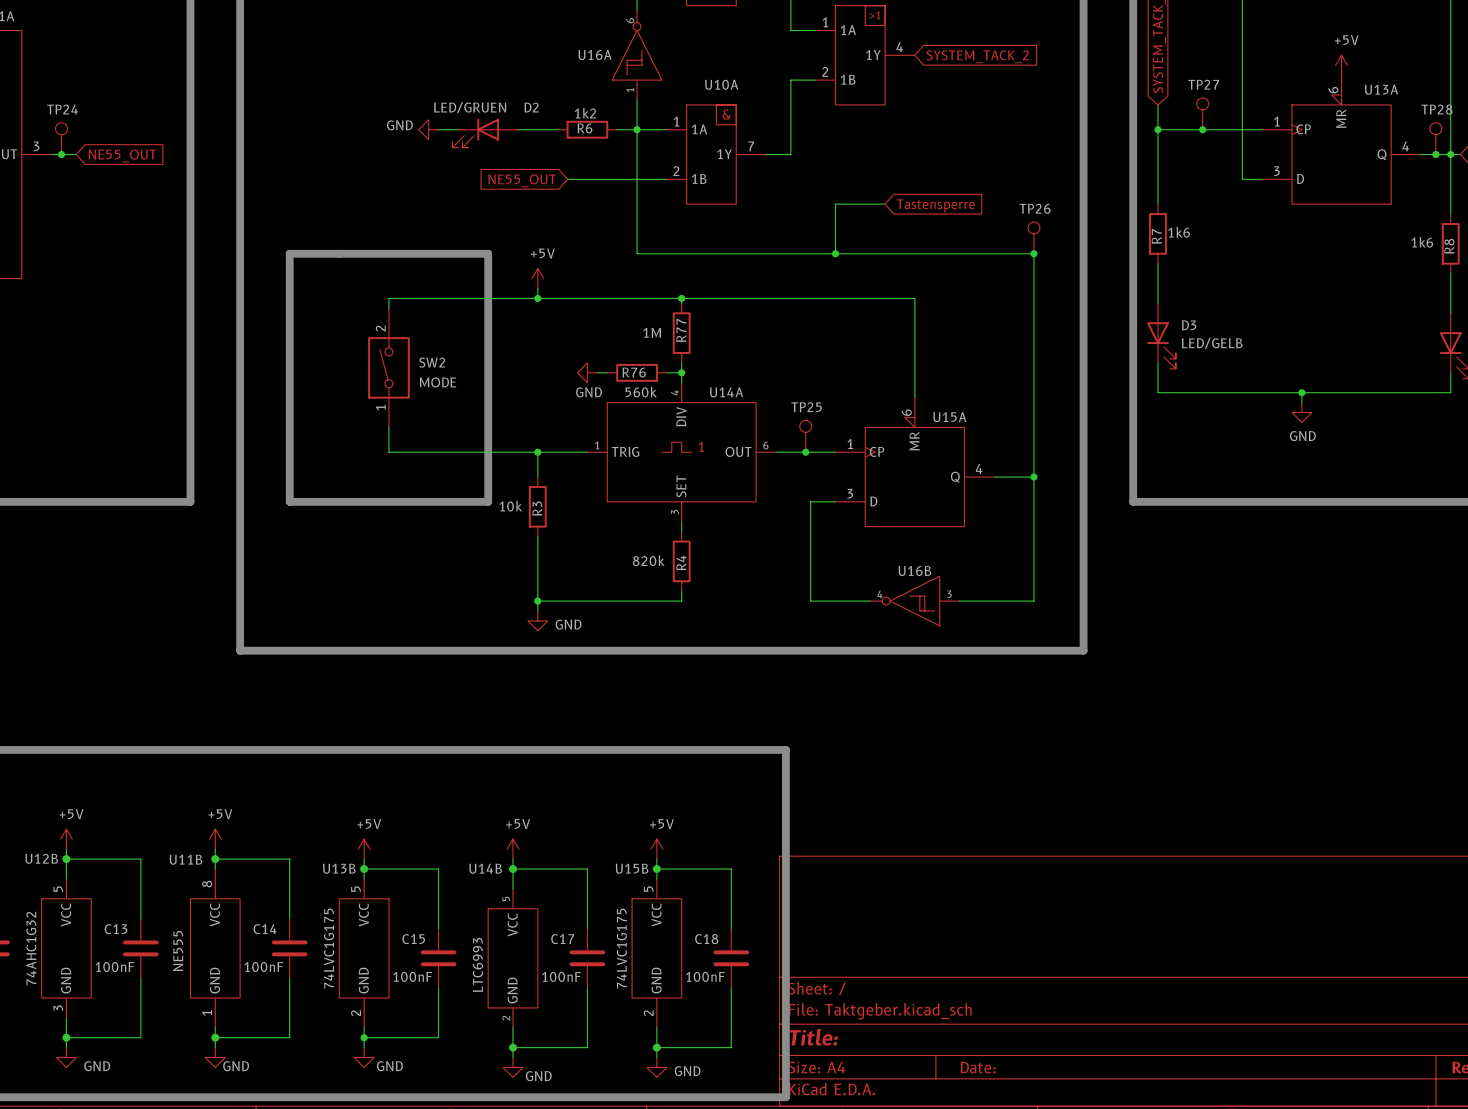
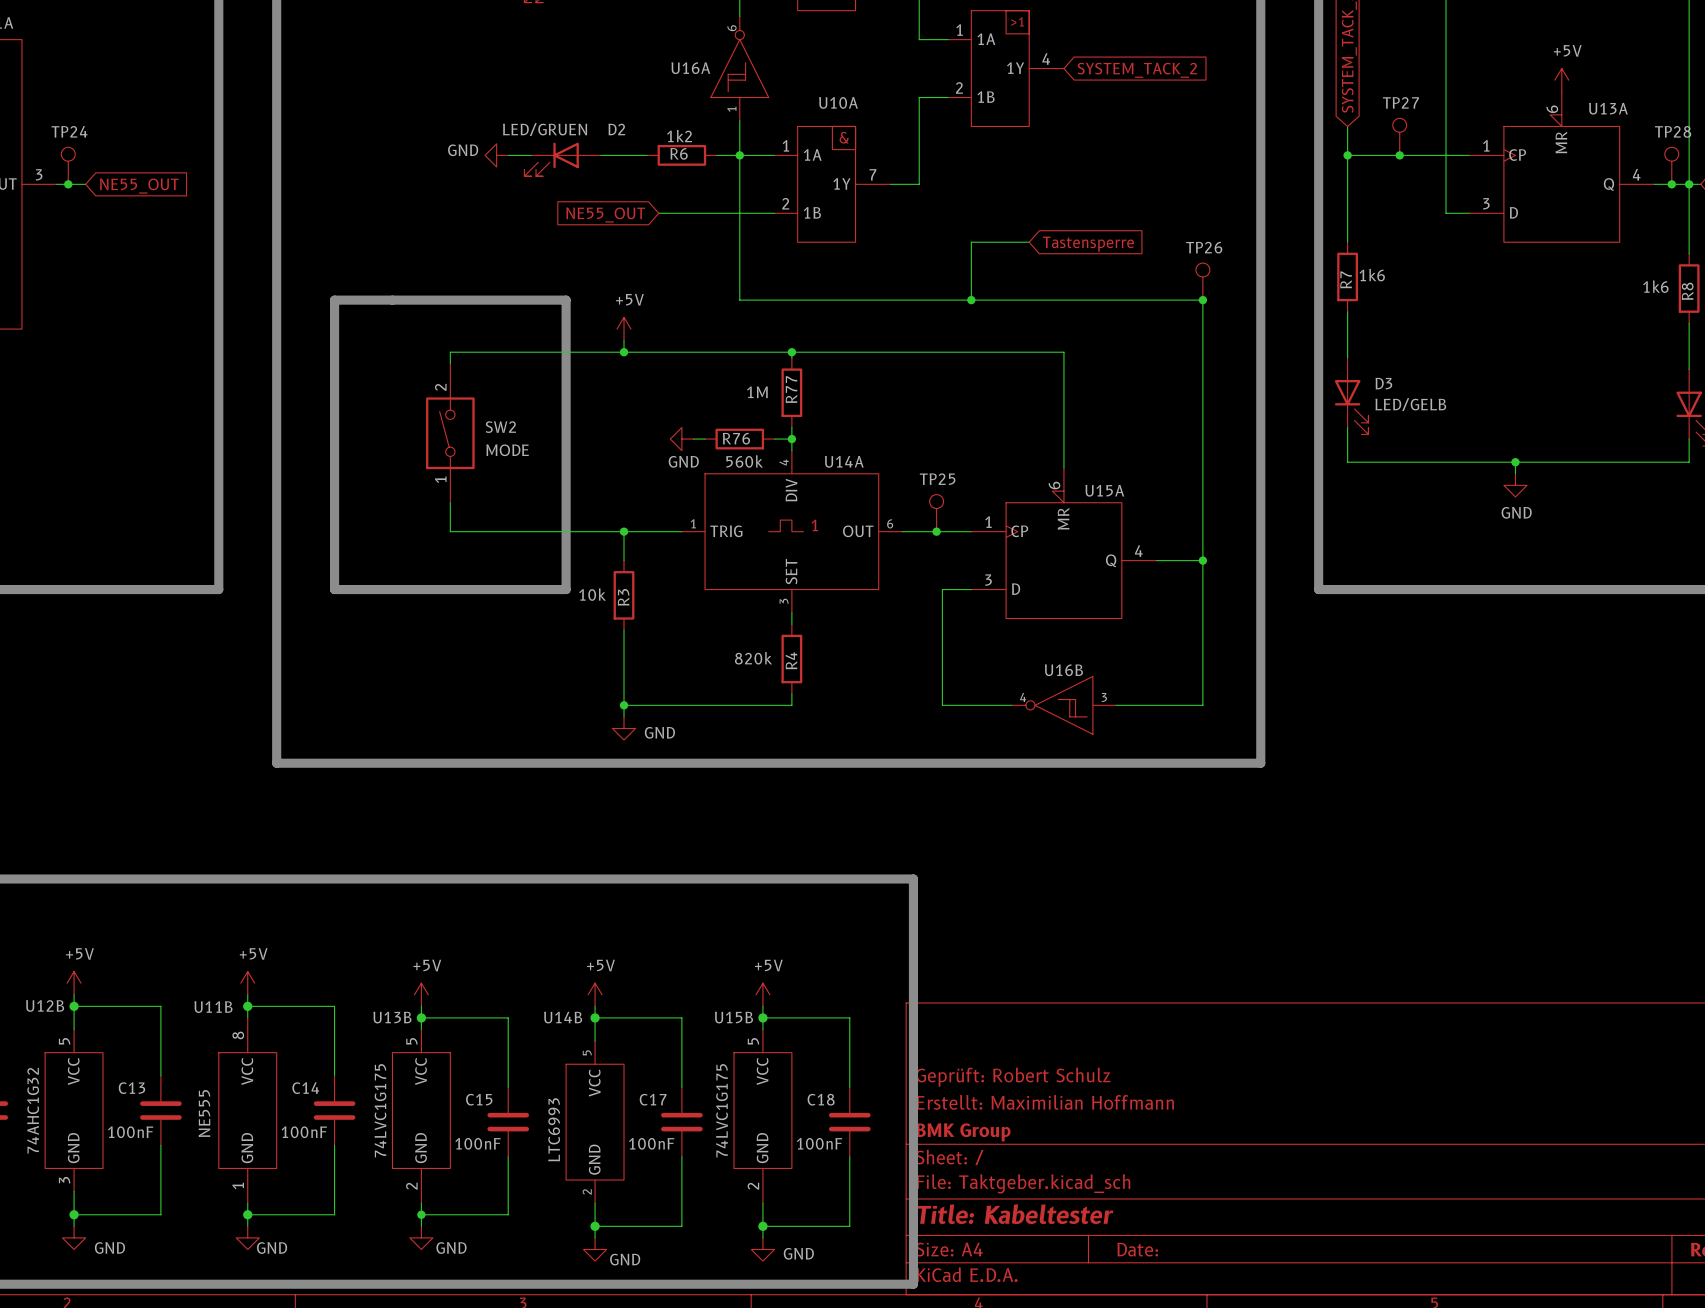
title block: none -> Geprüft: Robert Schulz (1013, 1077)
title block: none -> Erstellt: Maximilian Hoffmann (1045, 1102)
title block: none -> BMK Group (963, 1132)
title block: Title: (813, 1037) -> Title: Kabeltester (1015, 1214)

